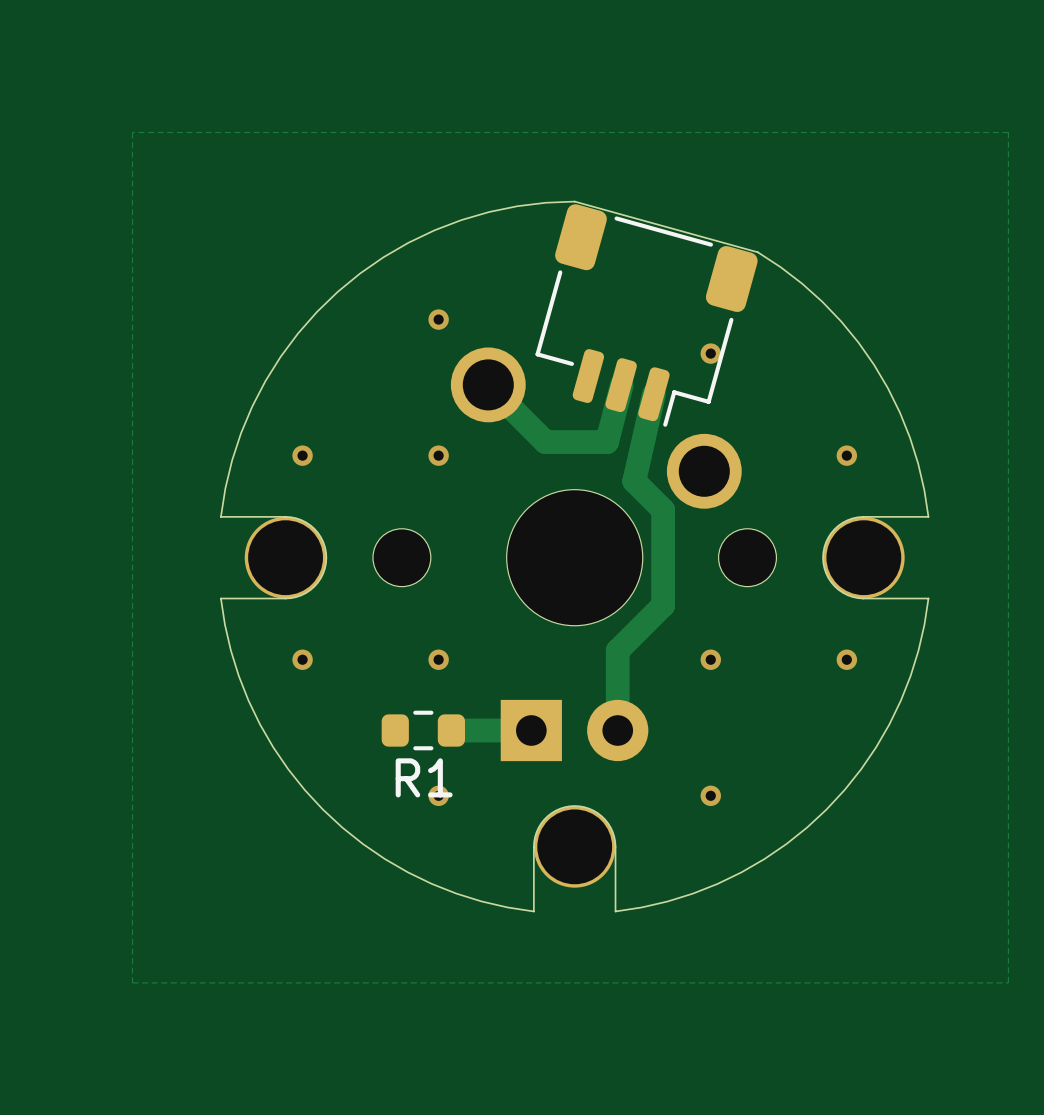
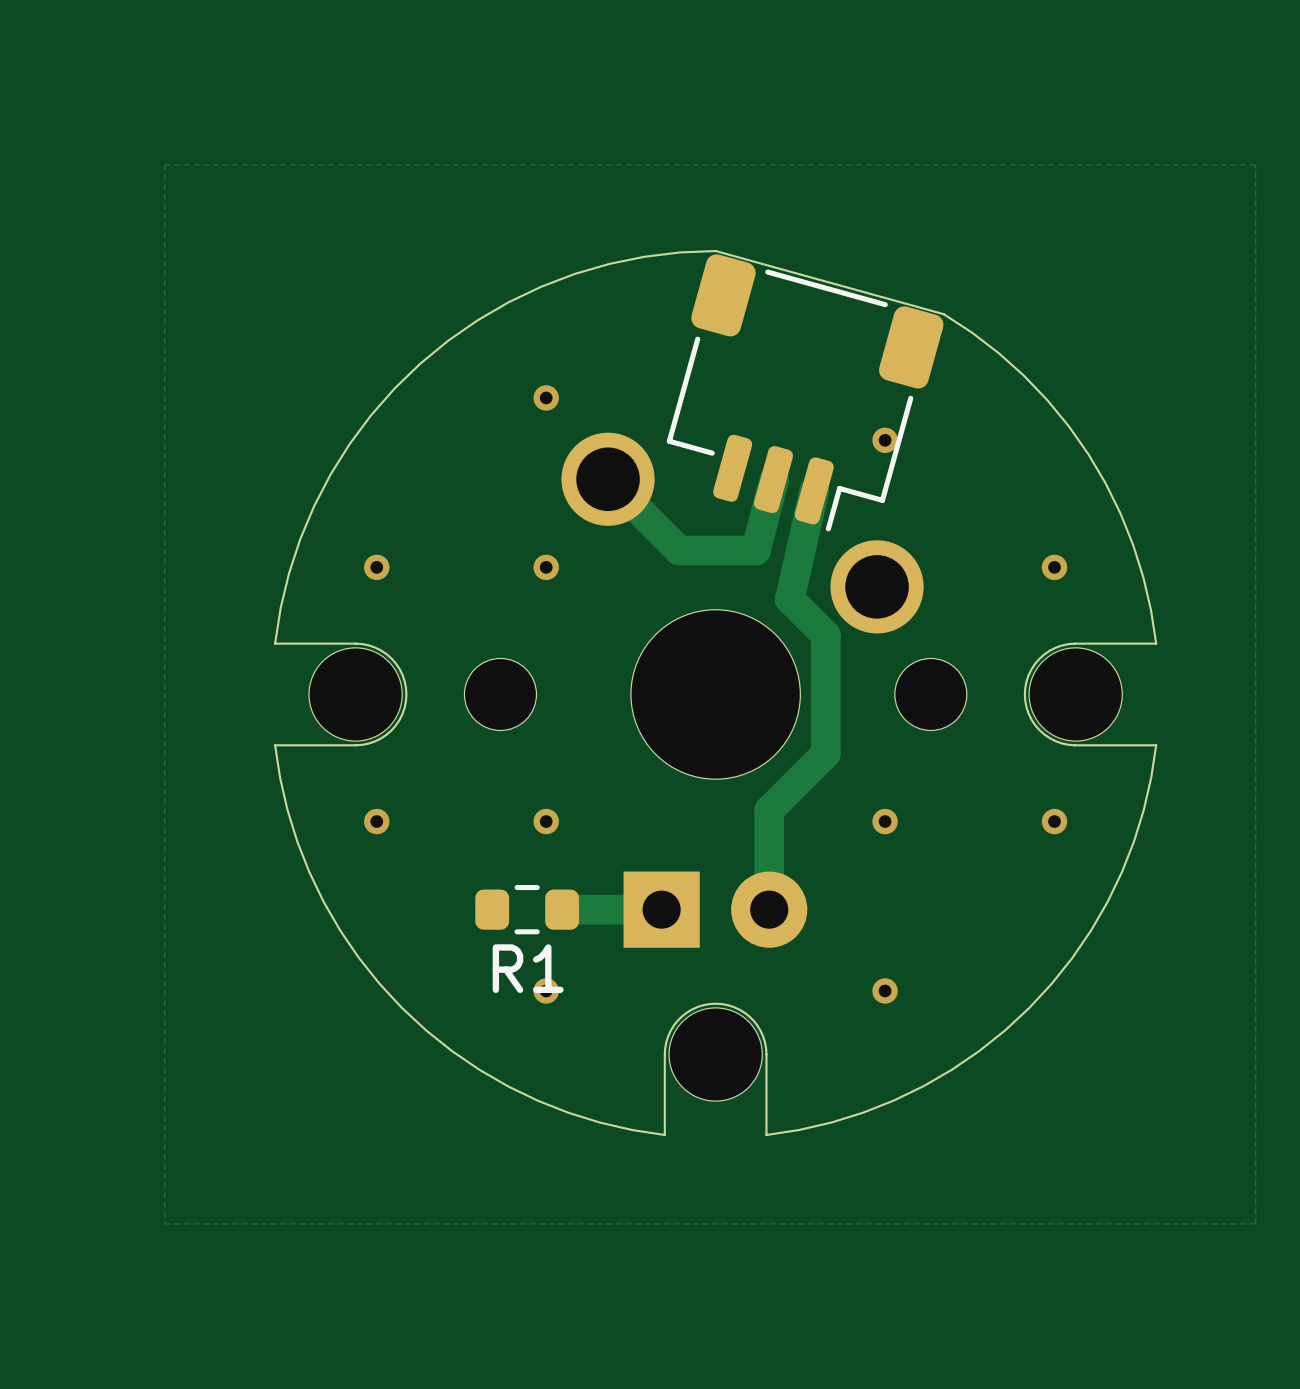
part footprint: [244, 516, 327, 599] -> [309, 647, 403, 742]
part footprint: [823, 516, 905, 599] -> [1029, 647, 1123, 742]
part footprint: [533, 806, 616, 888] -> [669, 1007, 763, 1102]

